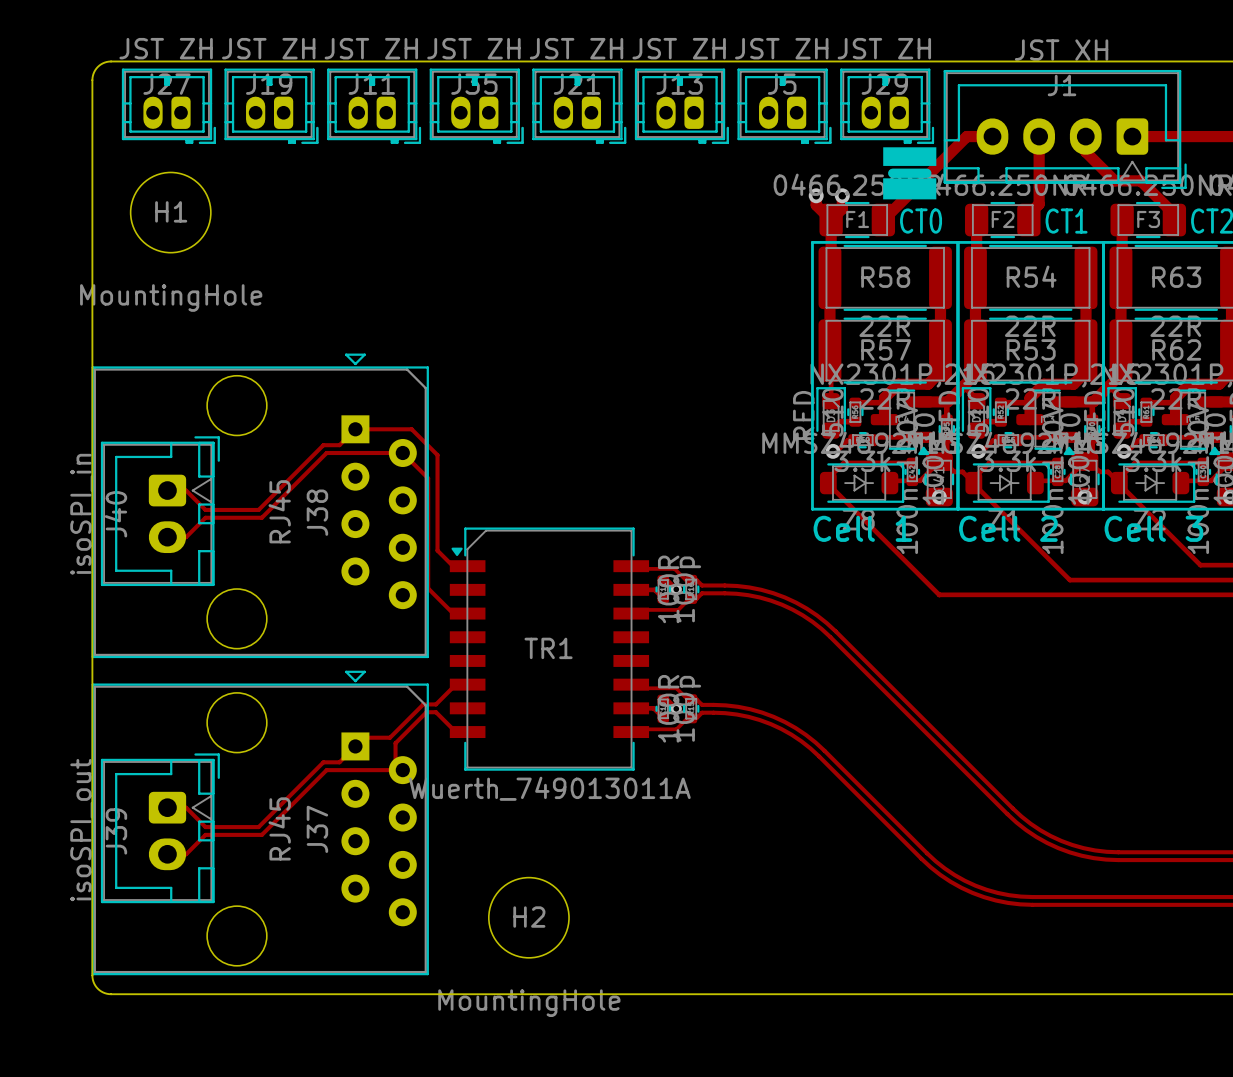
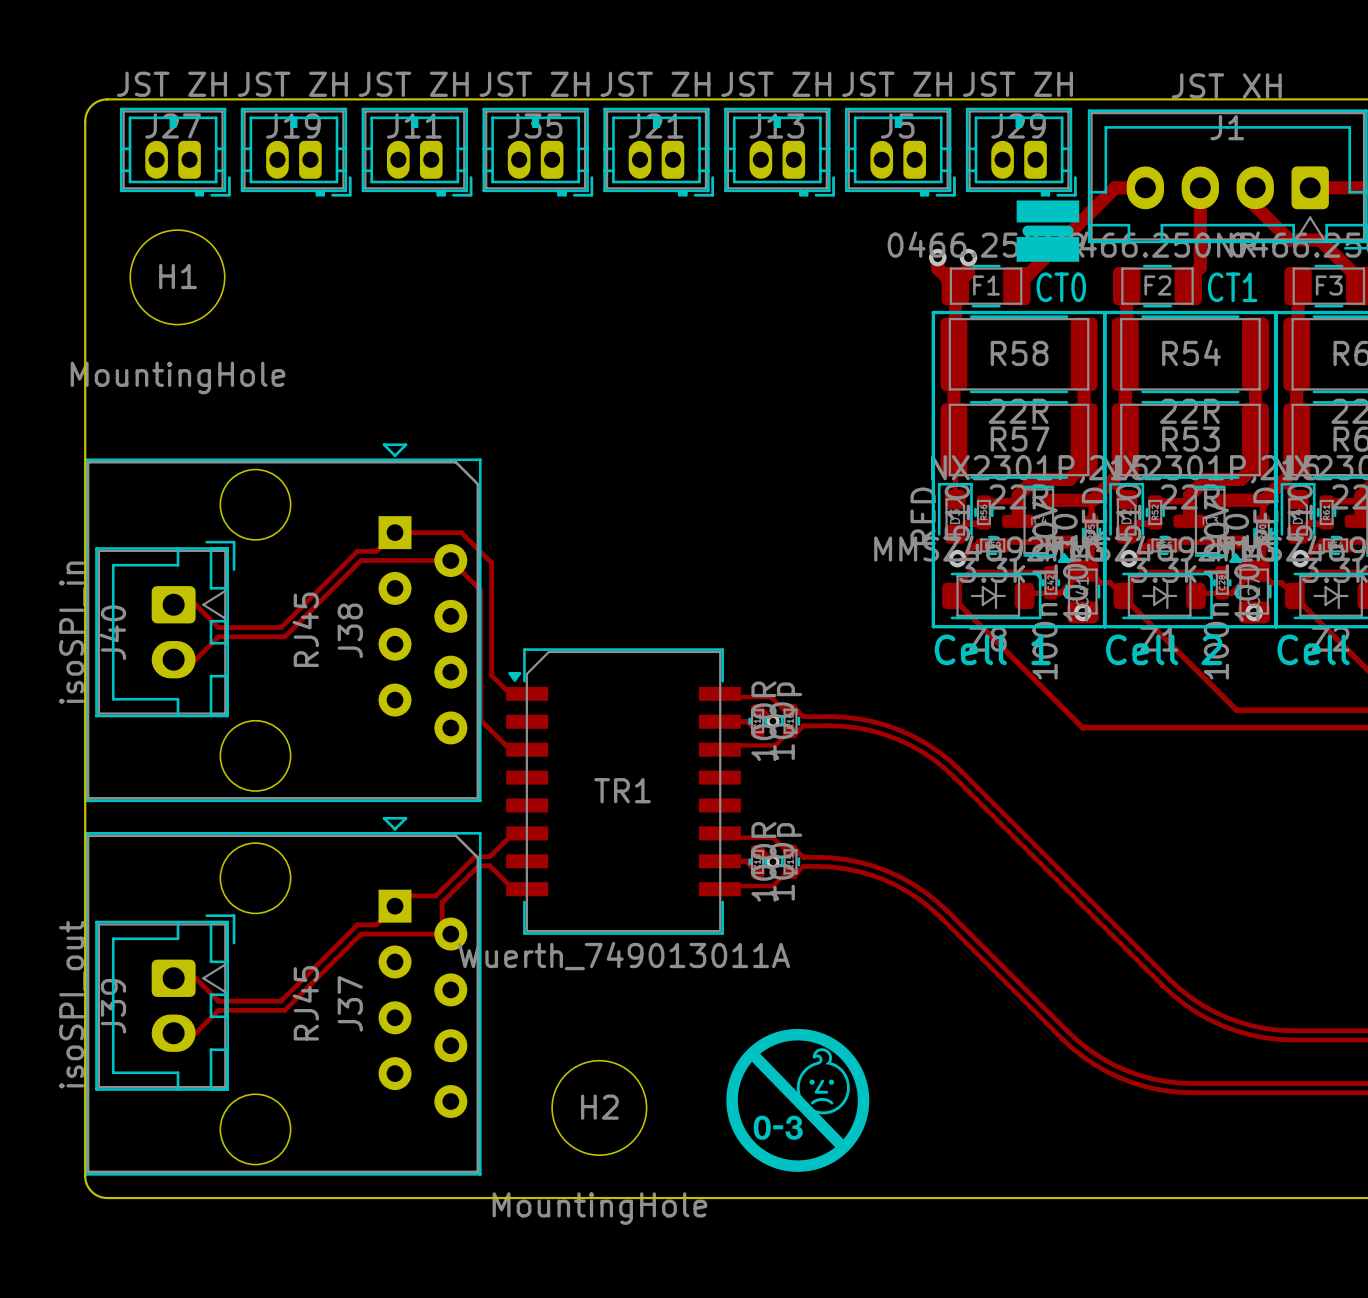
drawing: none -> [726, 1028, 870, 1172]

